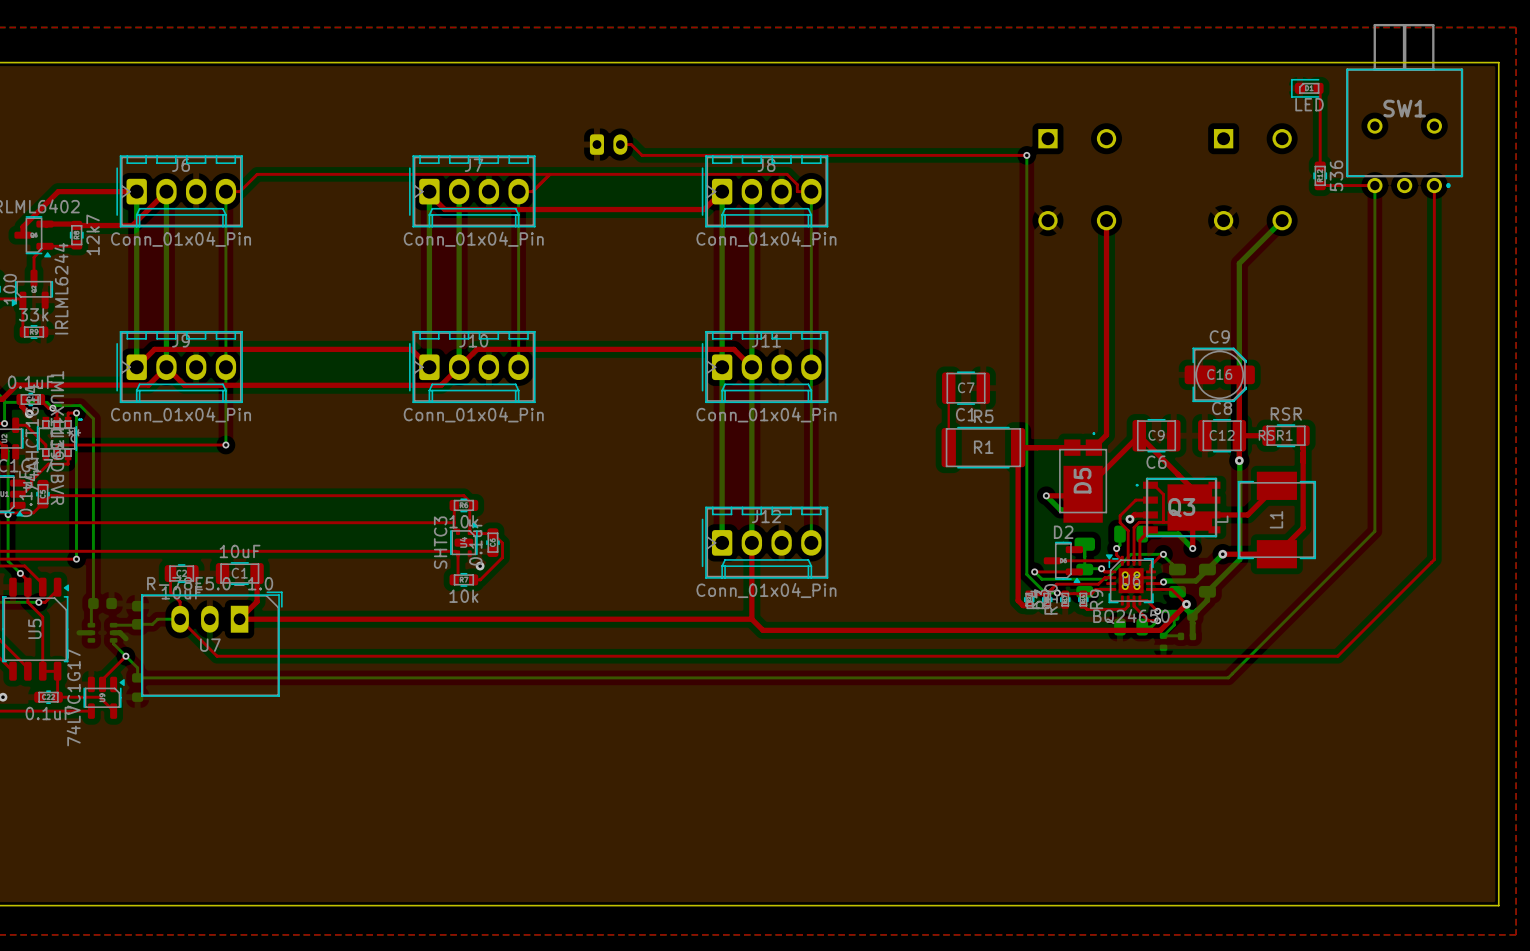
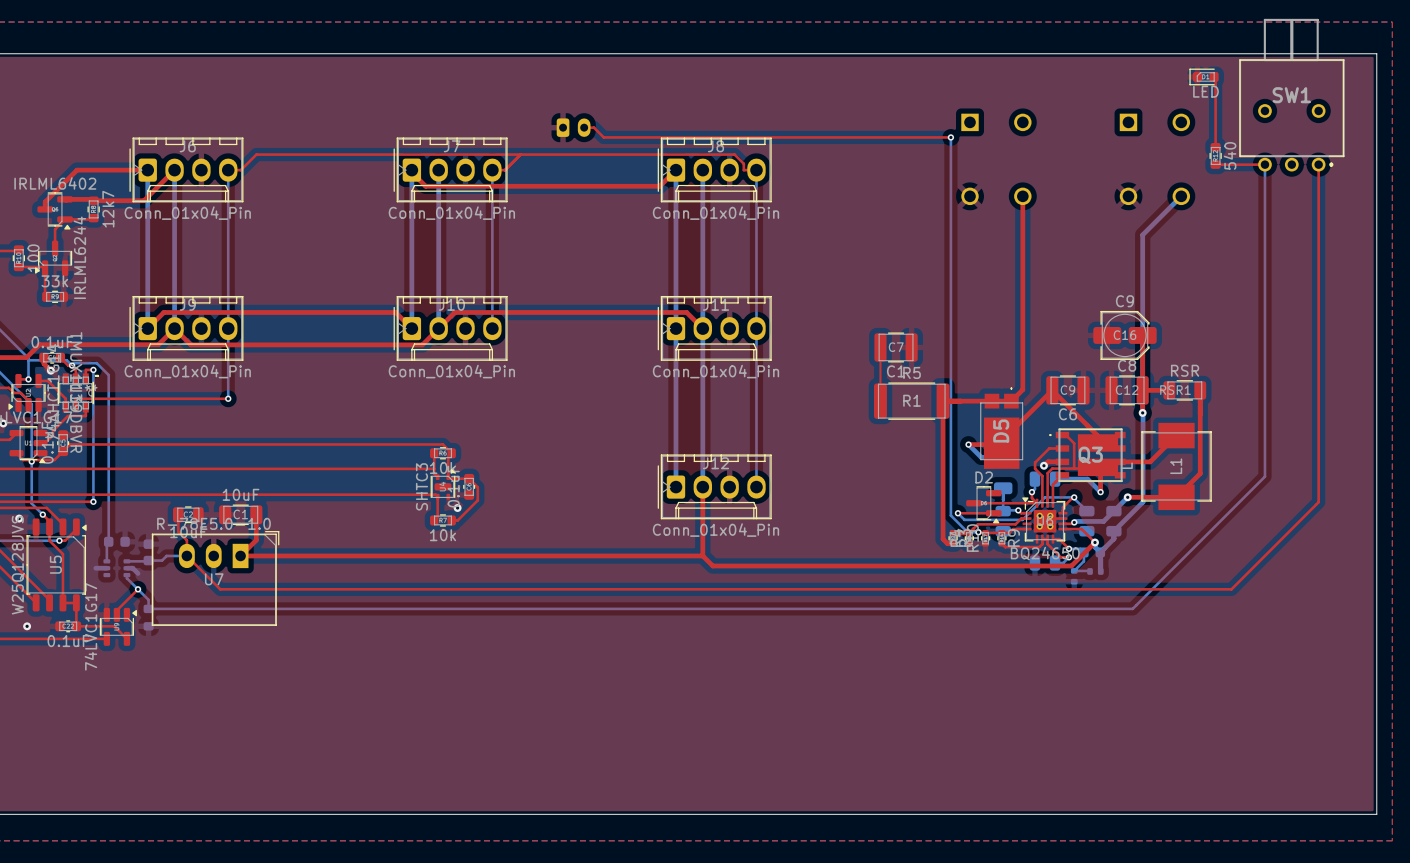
part value: 536 (1336, 175) -> 540 (1230, 155)

